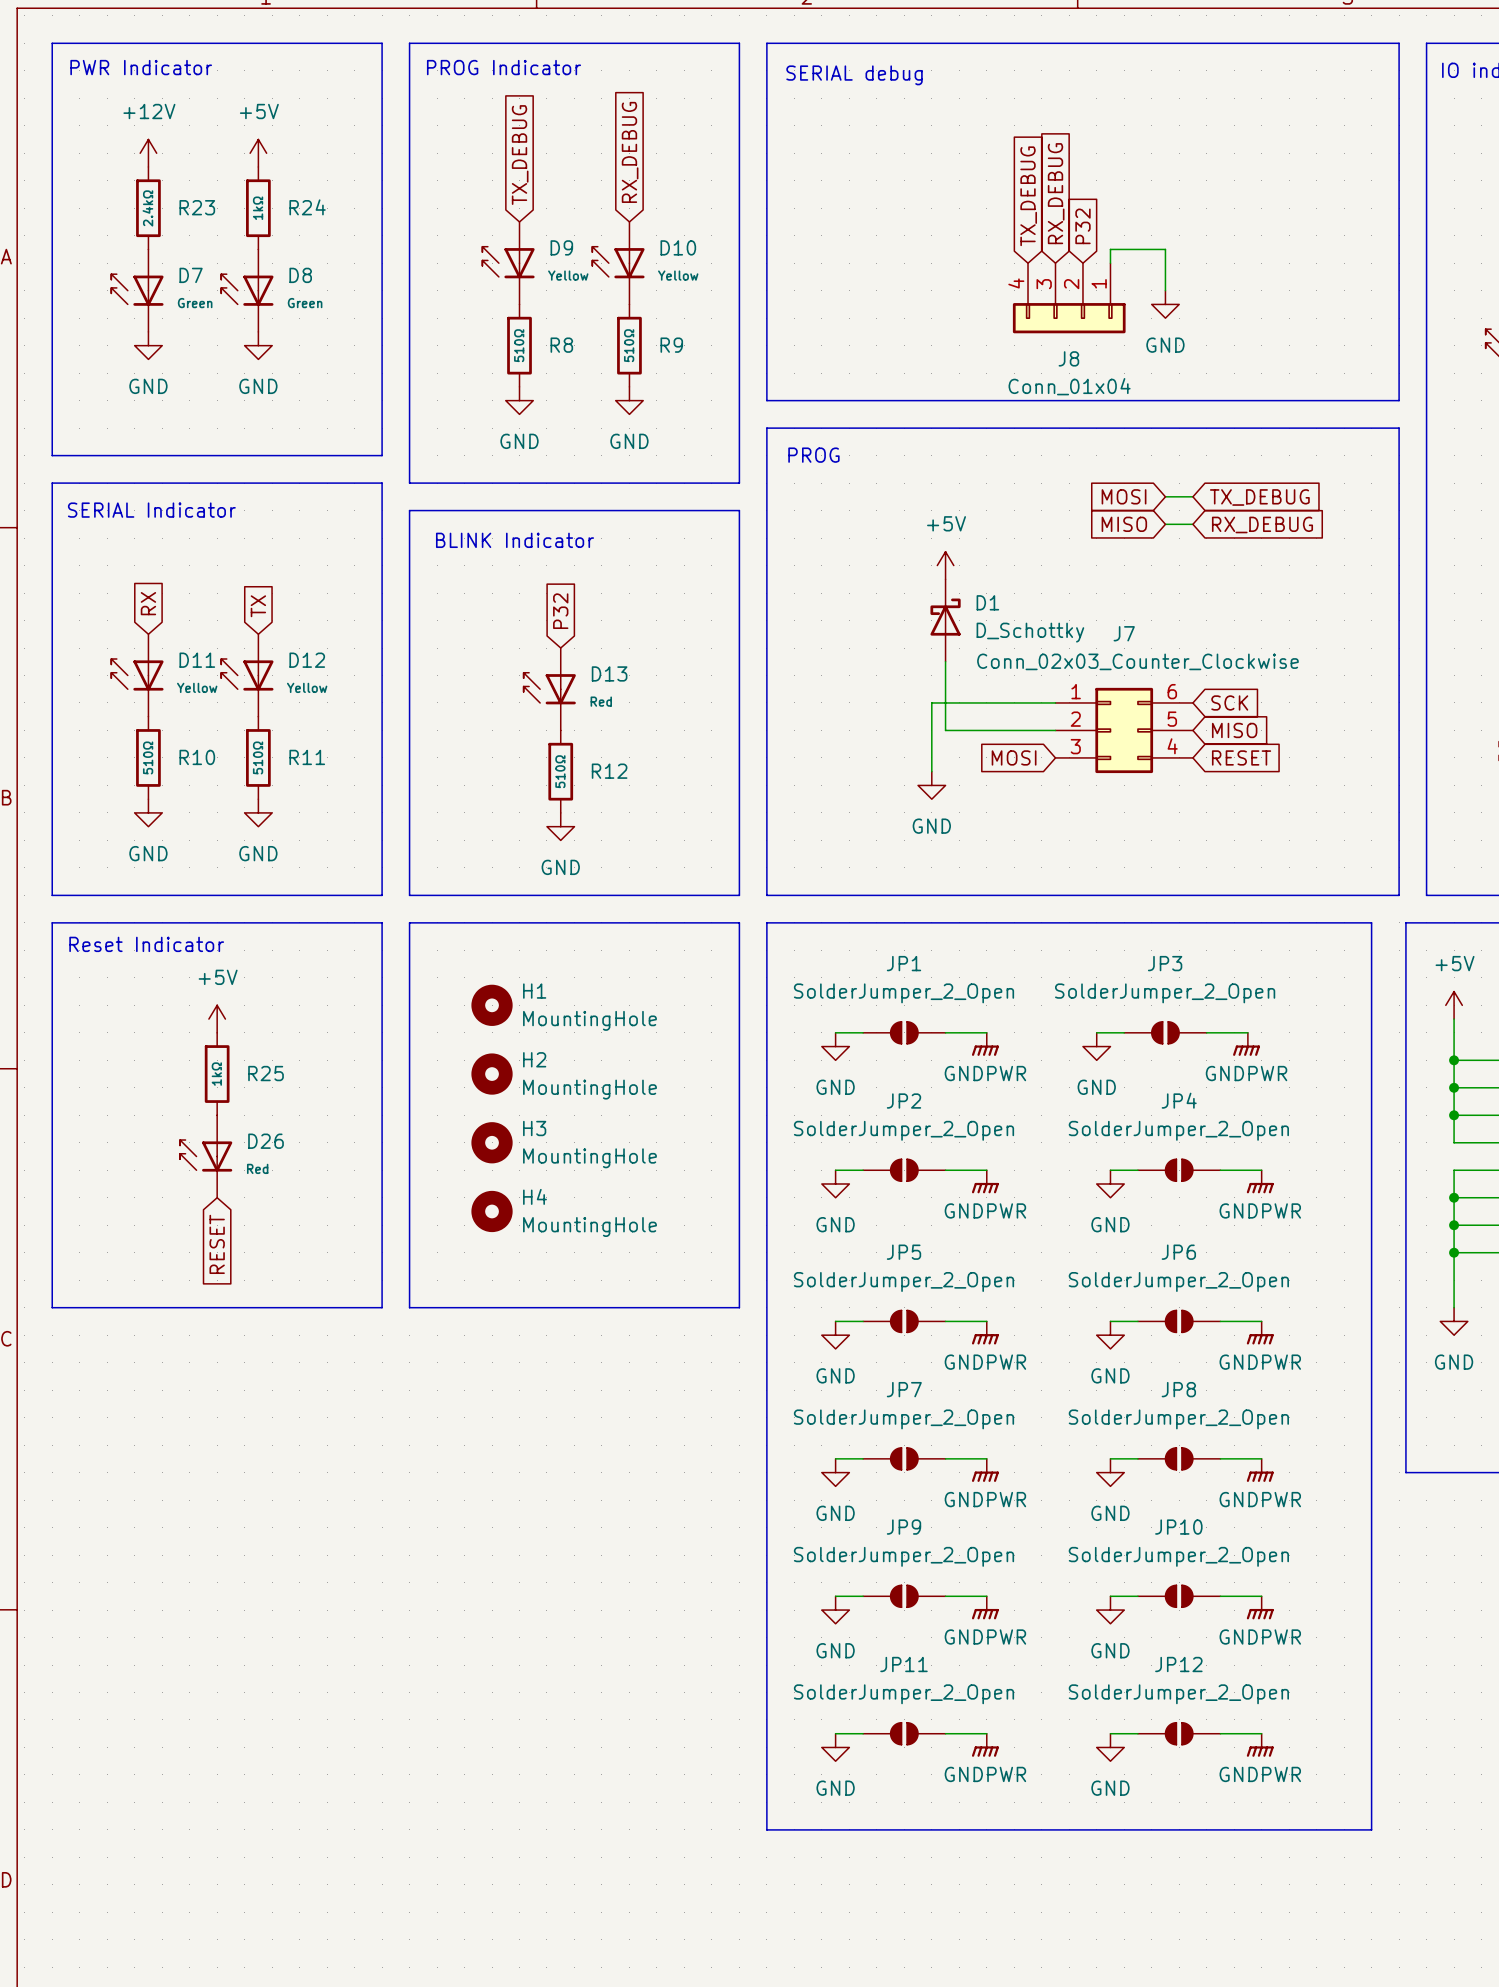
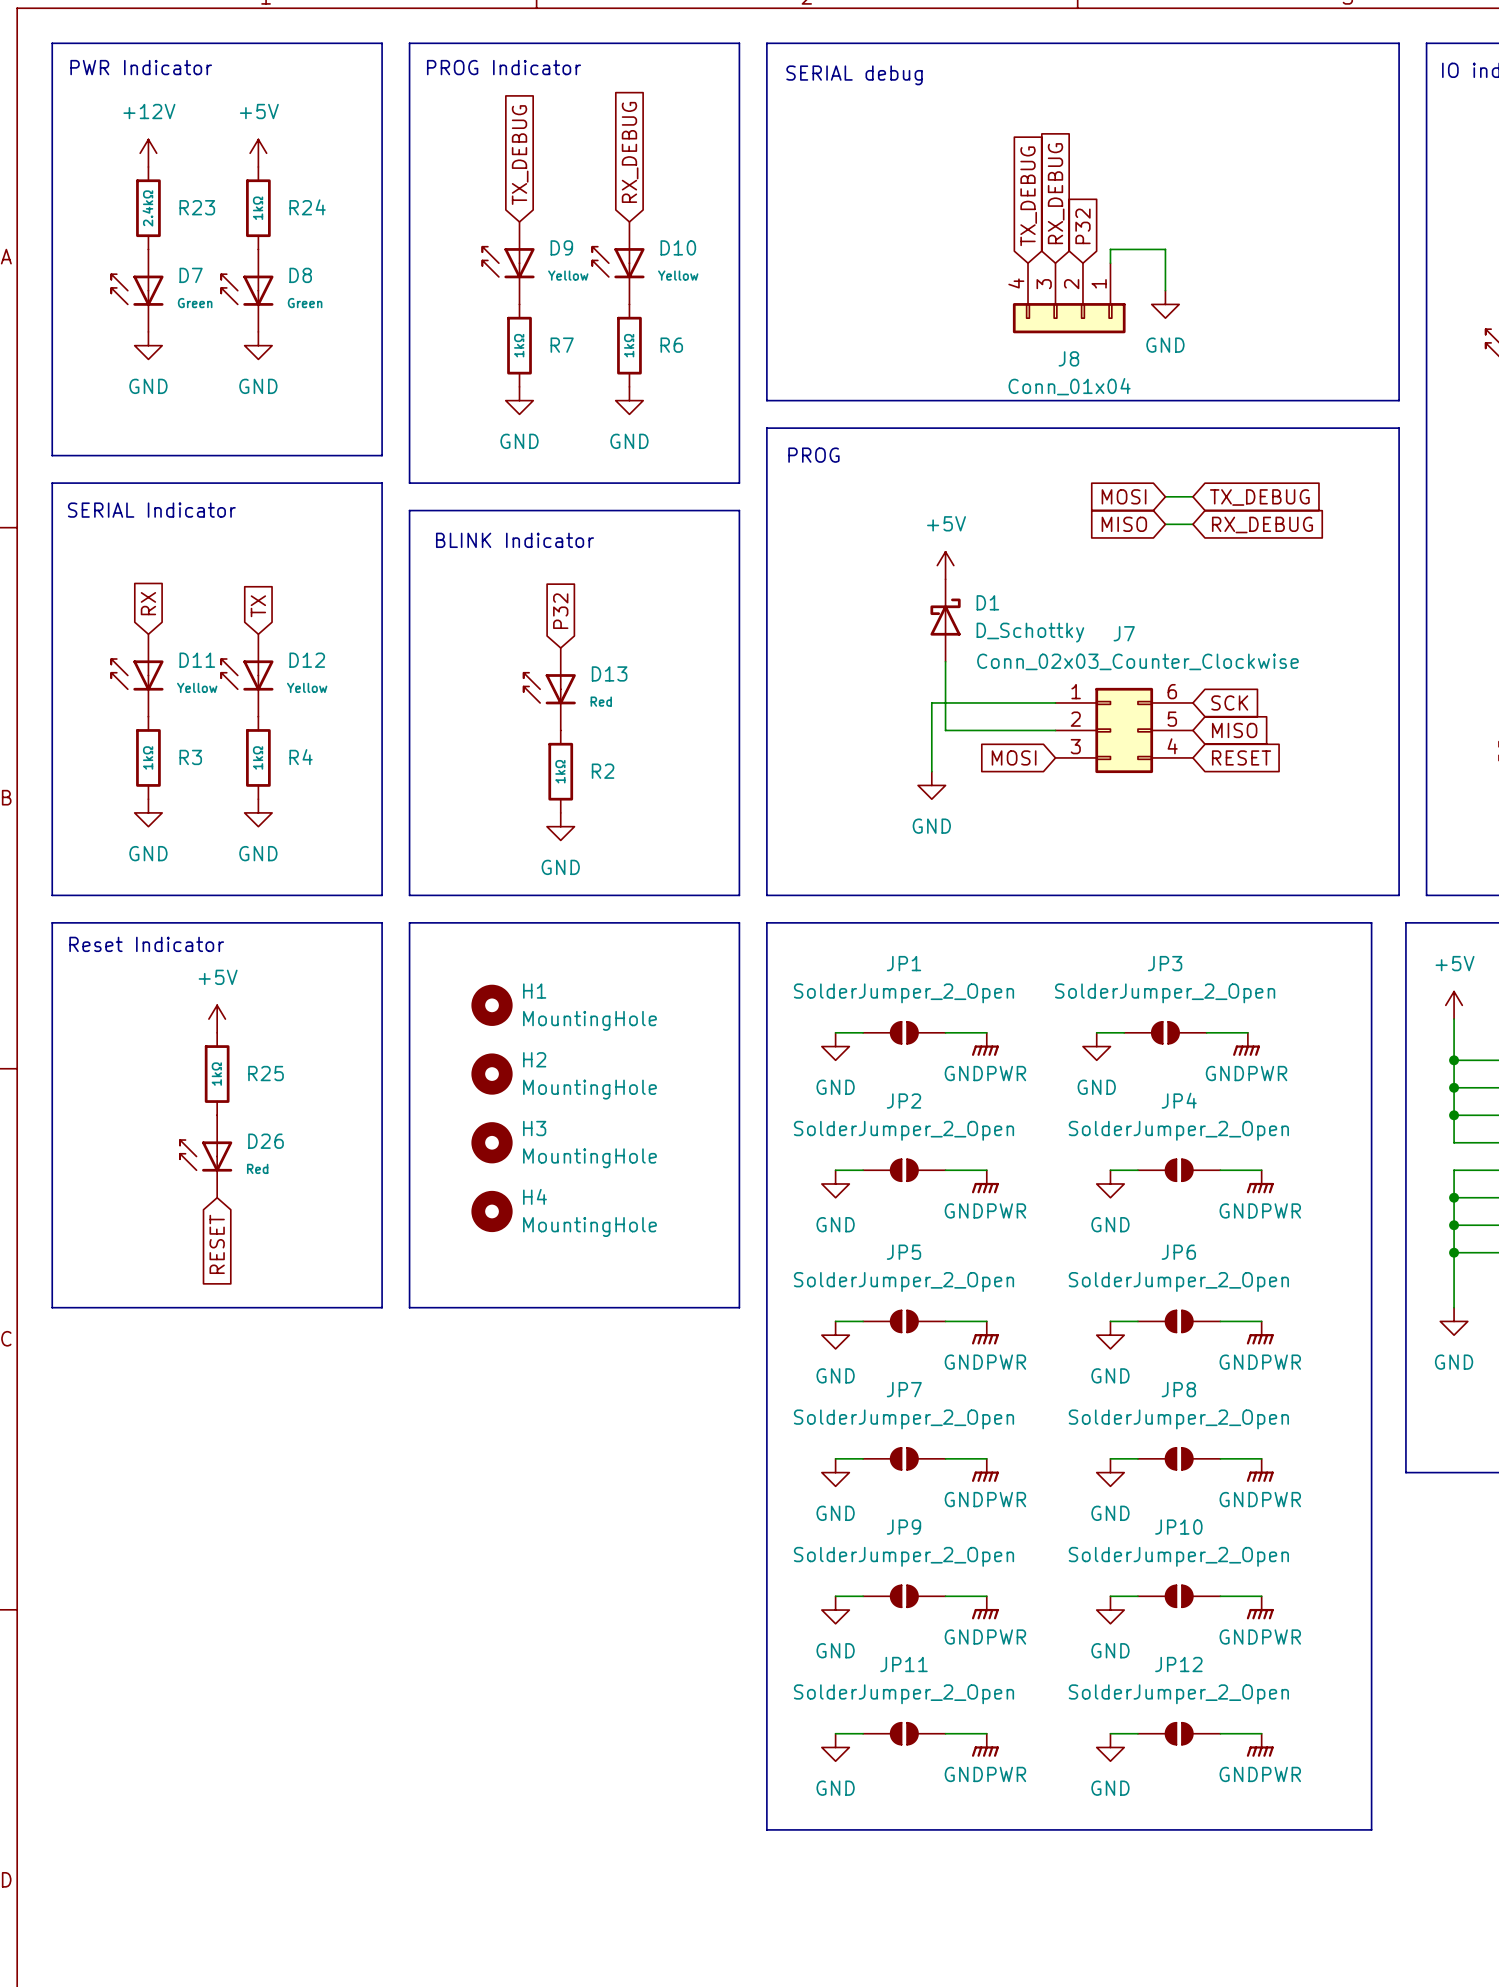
R8 value: 510Ω (519, 345) -> 1kΩ (519, 345)
R8 name: R8 (561, 345) -> R7 (562, 345)
R9 value: 510Ω (629, 345) -> 1kΩ (629, 345)
R9 name: R9 (671, 345) -> R6 (671, 345)
R10 value: 510Ω (148, 757) -> 1kΩ (148, 757)
R10 name: R10 (197, 757) -> R3 (190, 757)
R11 value: 510Ω (258, 757) -> 1kΩ (258, 757)
R11 name: R11 (307, 757) -> R4 (301, 757)
R12 value: 510Ω (560, 771) -> 1kΩ (560, 771)
R12 name: R12 (609, 771) -> R2 (603, 771)

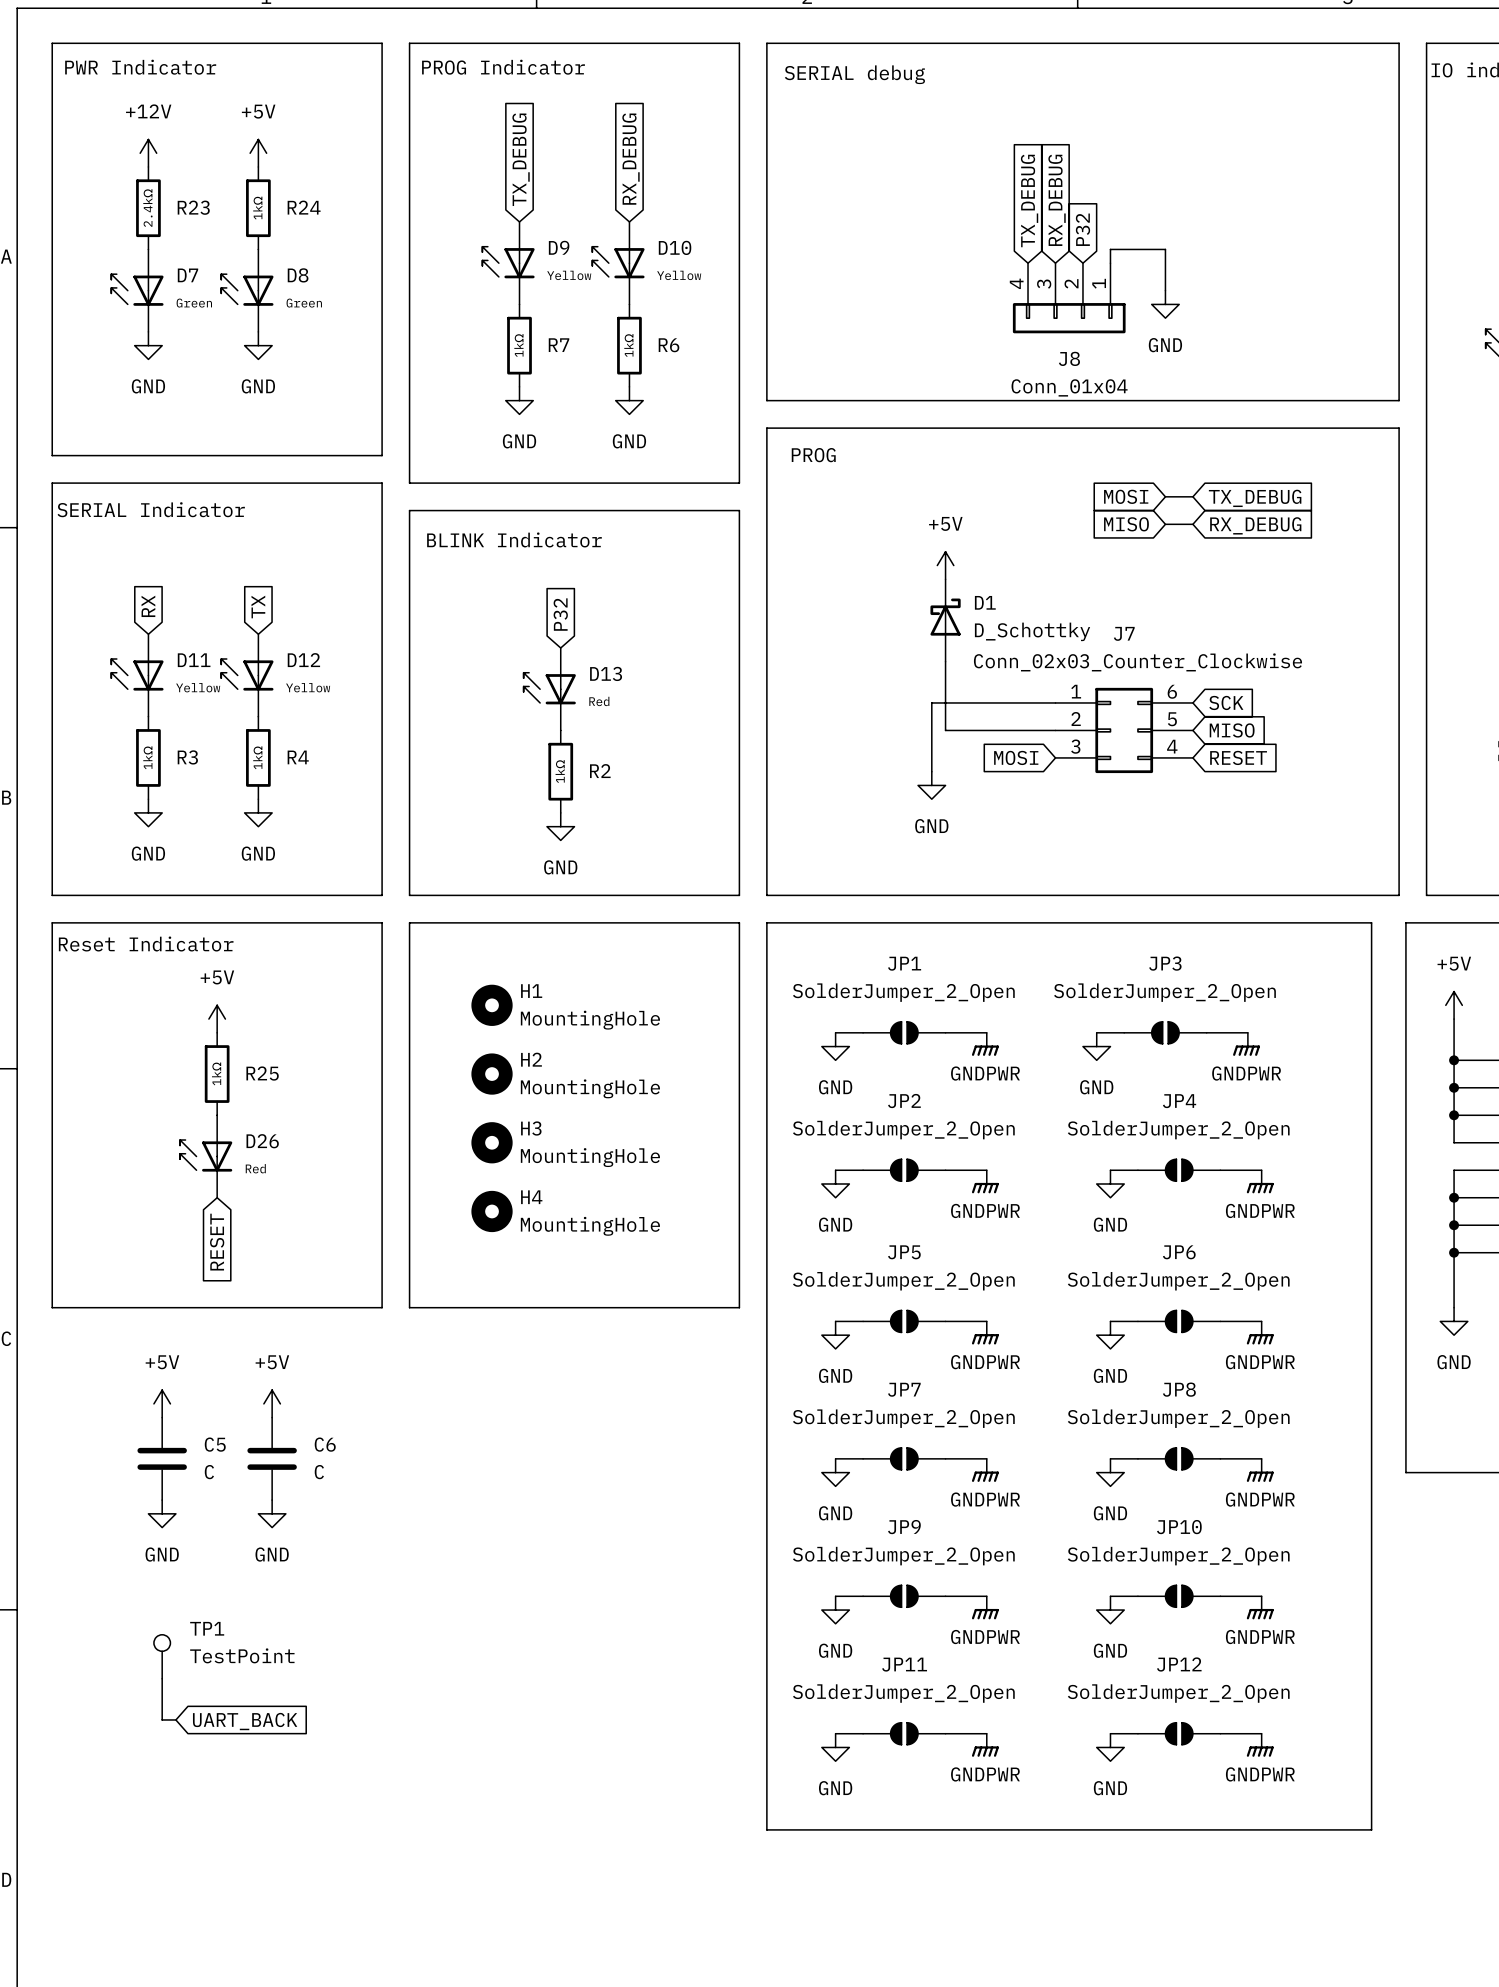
power symbol: none -> +5V (162, 1403)
power symbol: none -> +5V (272, 1403)
C5: none -> C (162, 1458)
C6: none -> C (272, 1458)
power symbol: none -> GND (162, 1513)
power symbol: none -> GND (272, 1513)
TP1: none -> TestPoint (162, 1656)
wire: none -> (162, 1678) (162, 1719) (175, 1719)
global label: none -> UART_BACK (245, 1721)

